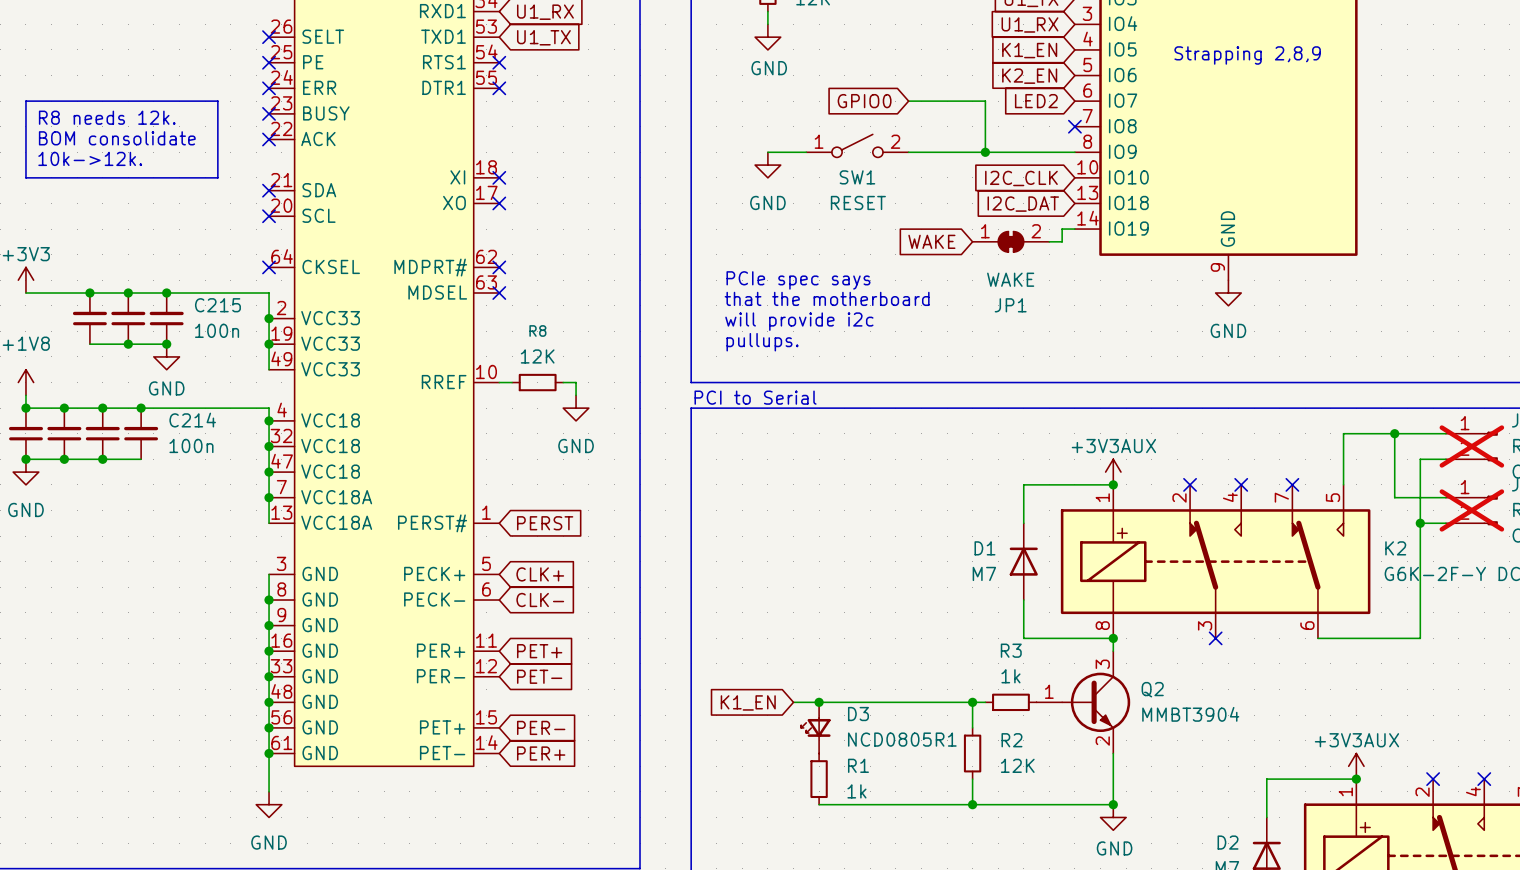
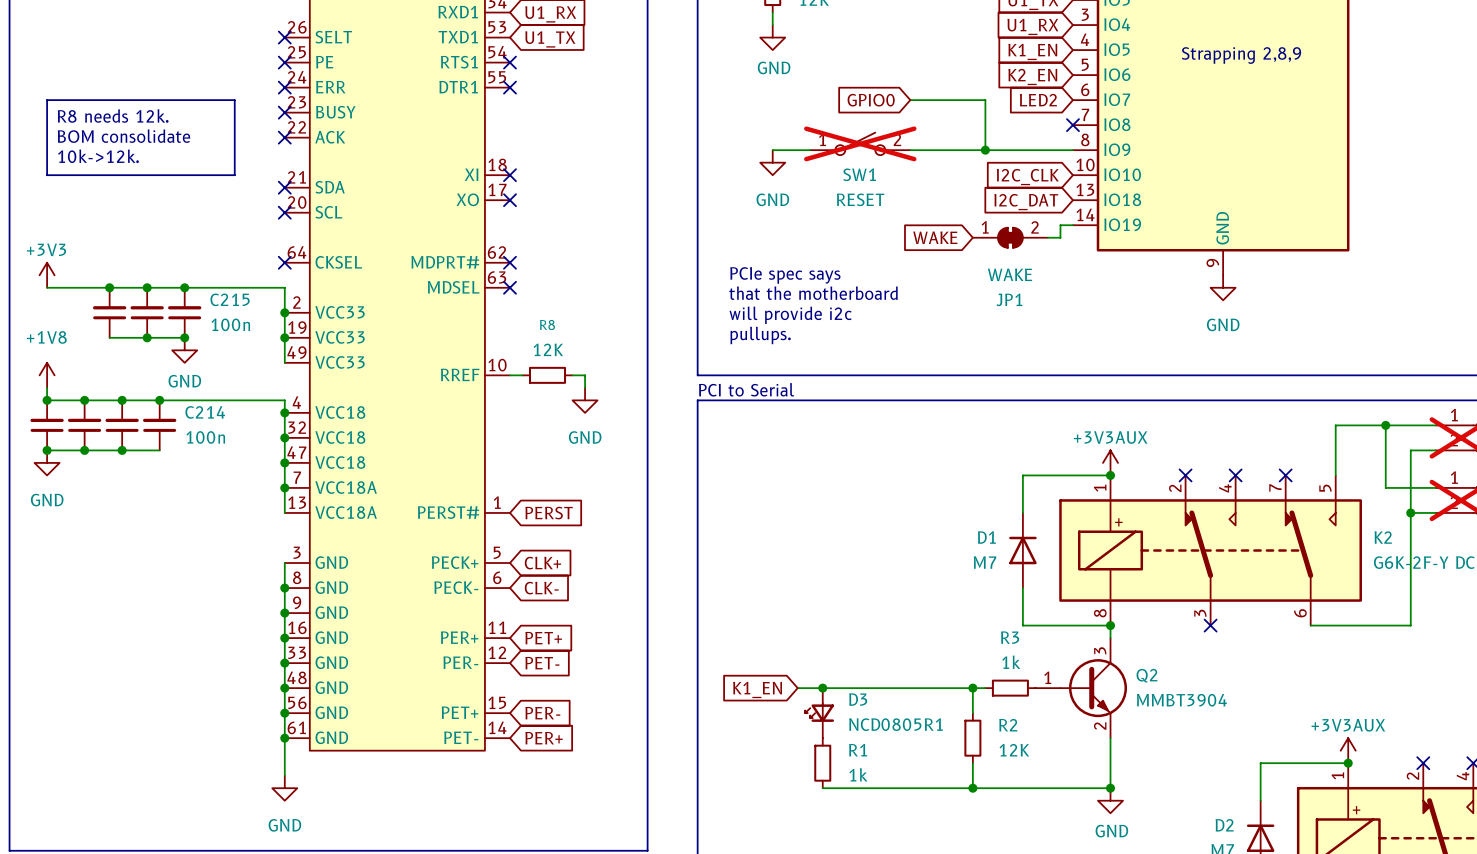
SW1 do-not-place cross: none -> (860, 143)

